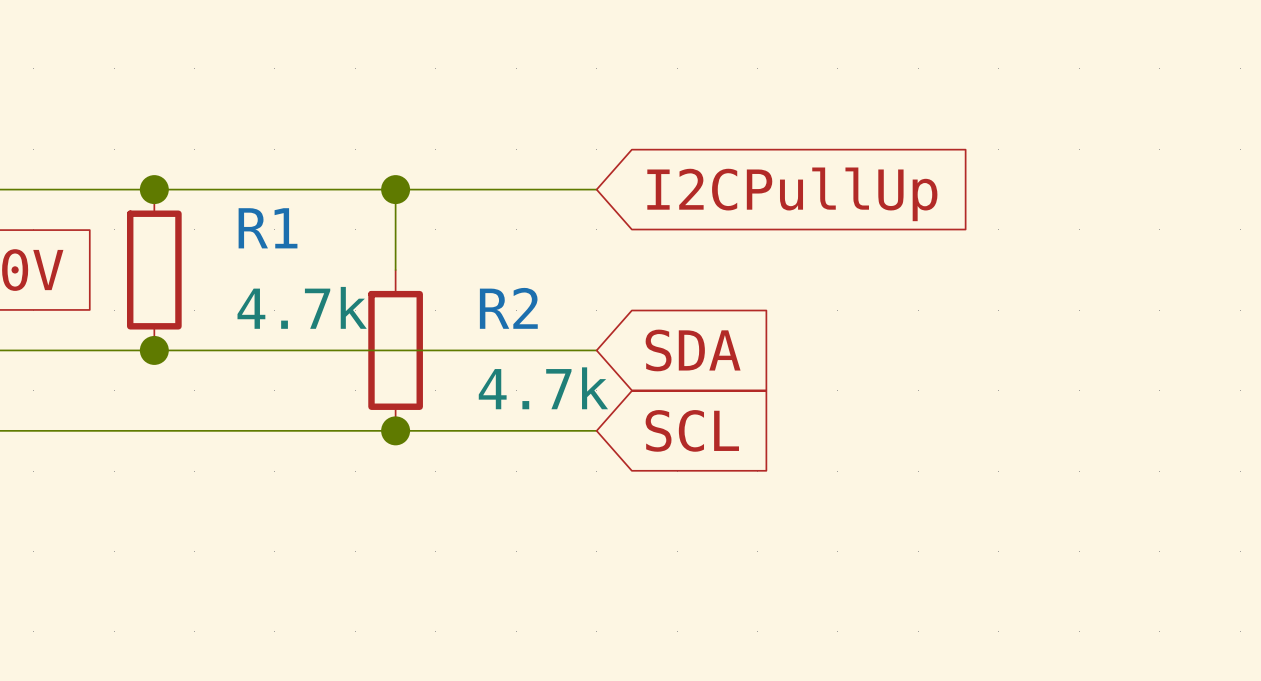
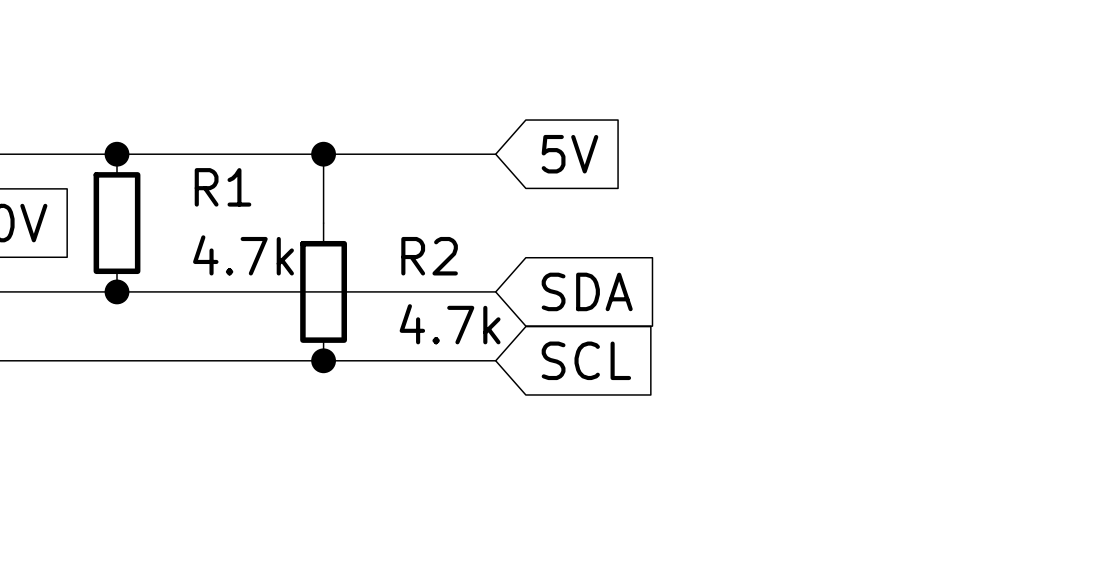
global label: I2CPullUp (792, 194) -> 5V (569, 154)

